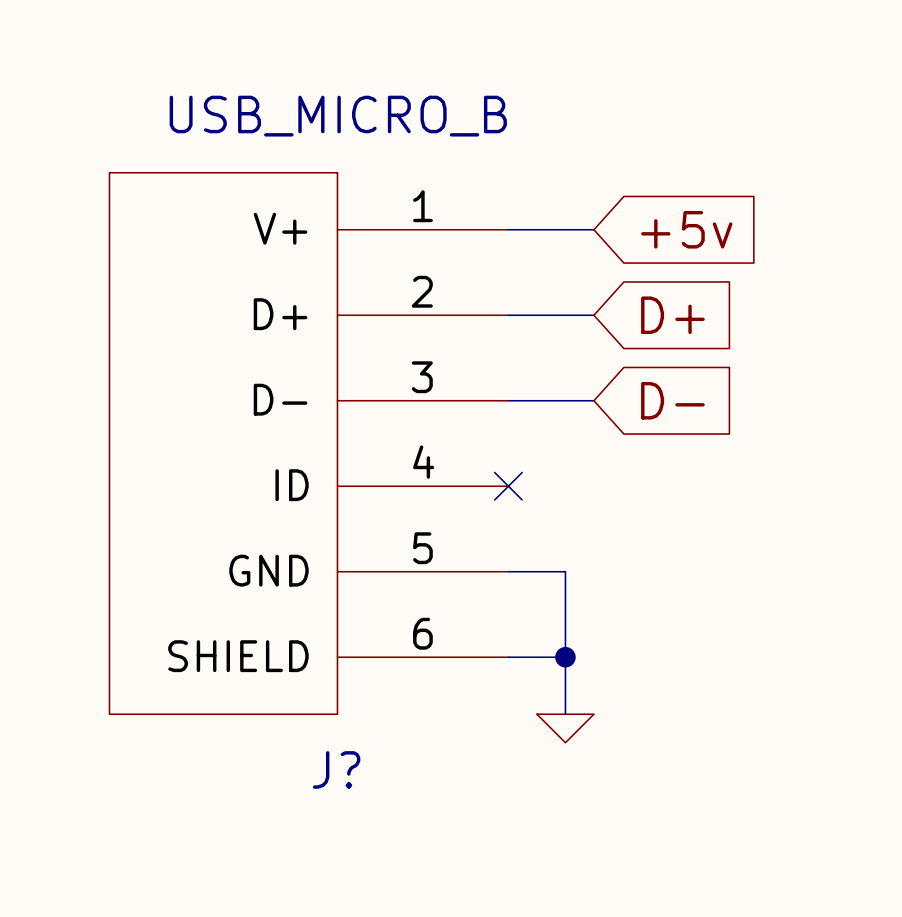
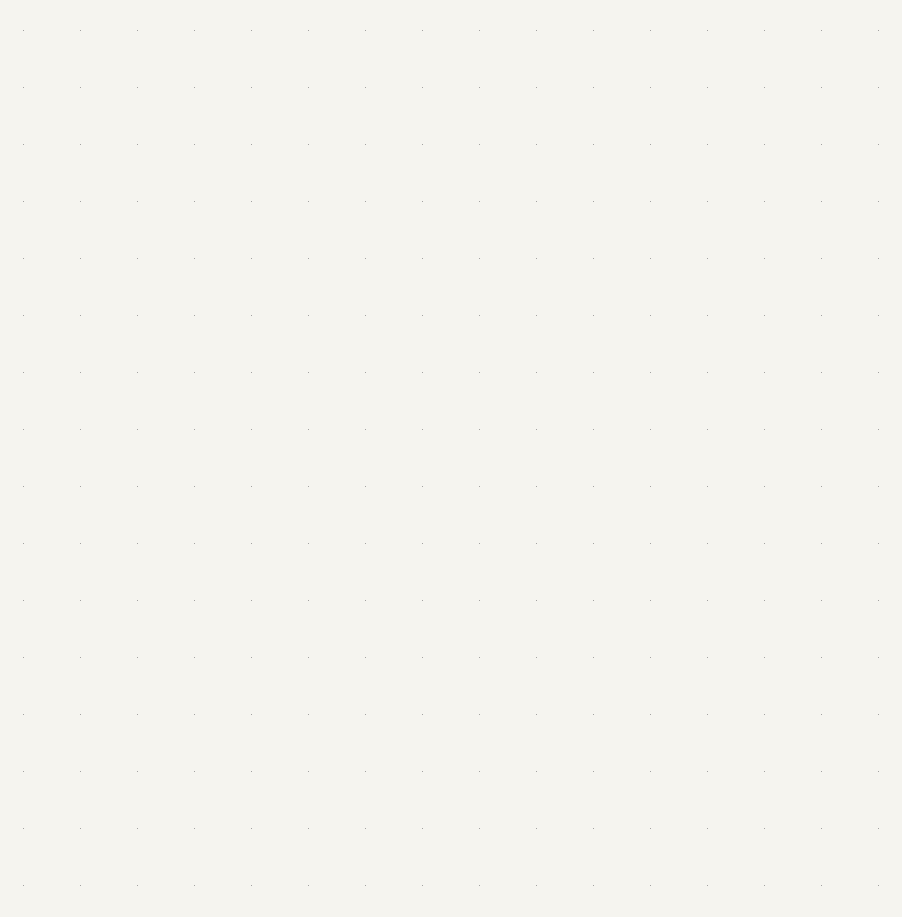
wire: (508, 229) (593, 229) -> none
global label: +5v (686, 229) -> none
wire: (508, 315) (593, 315) -> none
global label: D+ (672, 315) -> none
wire: (508, 400) (593, 400) -> none
global label: D- (672, 400) -> none
J?: USB_MICRO_B (308, 443) -> none
no-connect mark: (508, 486) -> none
wire: (508, 571) (565, 571) (565, 714) -> none
wire: (508, 657) (565, 657) -> none
junction: (565, 657) -> none
power symbol: (565, 728) -> none

